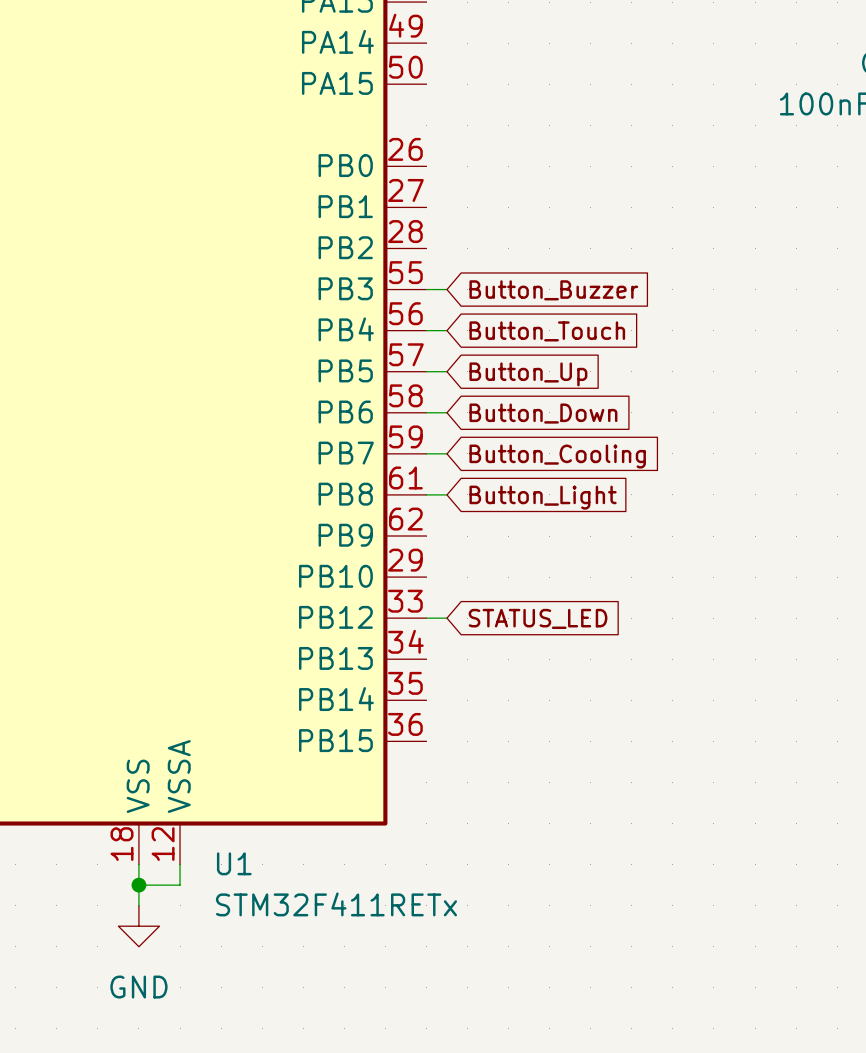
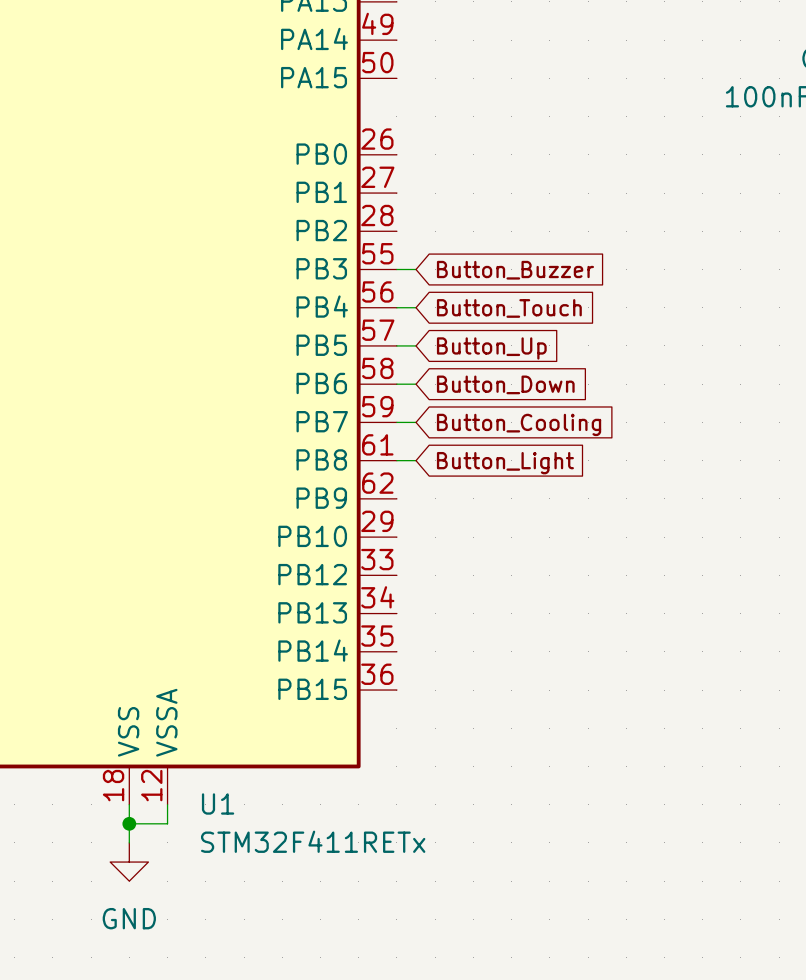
wire: (426, 618) (446, 618) -> none
global label: STATUS_LED (538, 618) -> none

